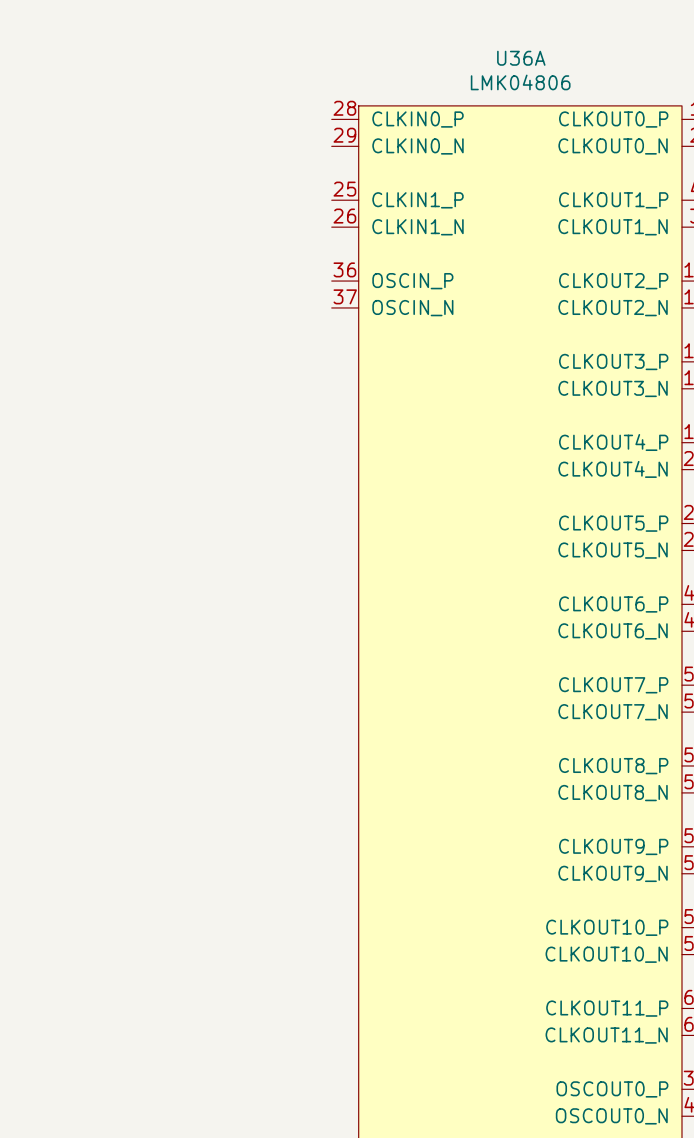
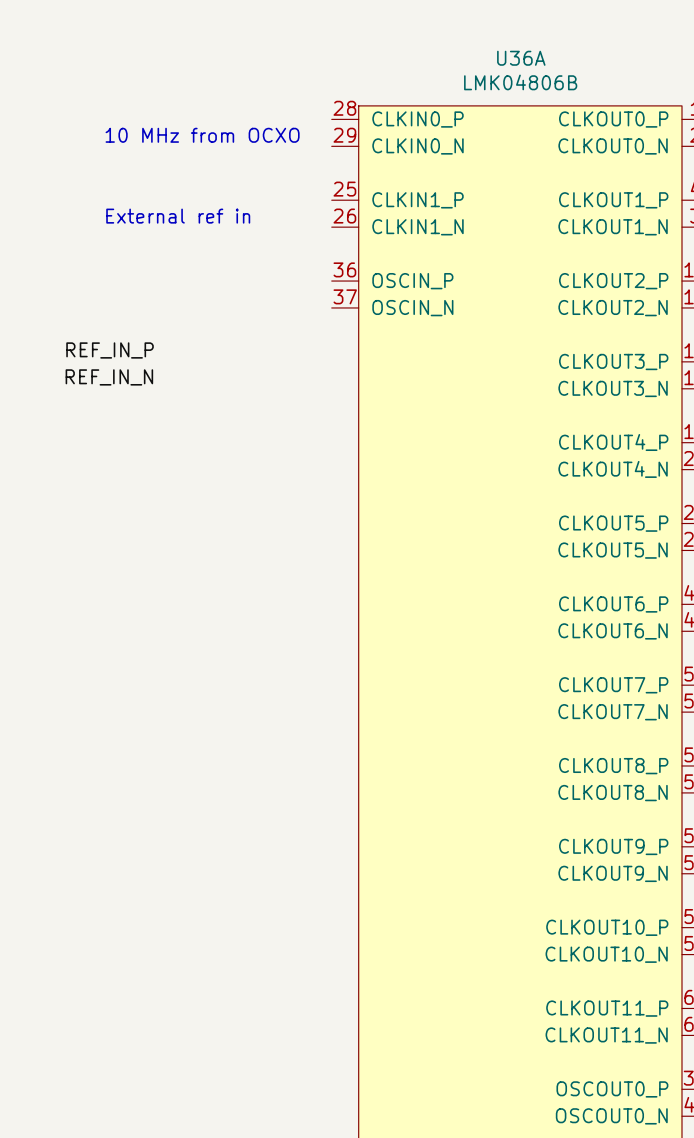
U36A value: LMK04806 (520, 82) -> LMK04806B (520, 82)
text: none -> 10 MHz from OCXO (202, 135)
text: none -> External ref in (178, 216)
label: none -> REF_IN_P (110, 350)
label: none -> REF_IN_N (109, 377)

